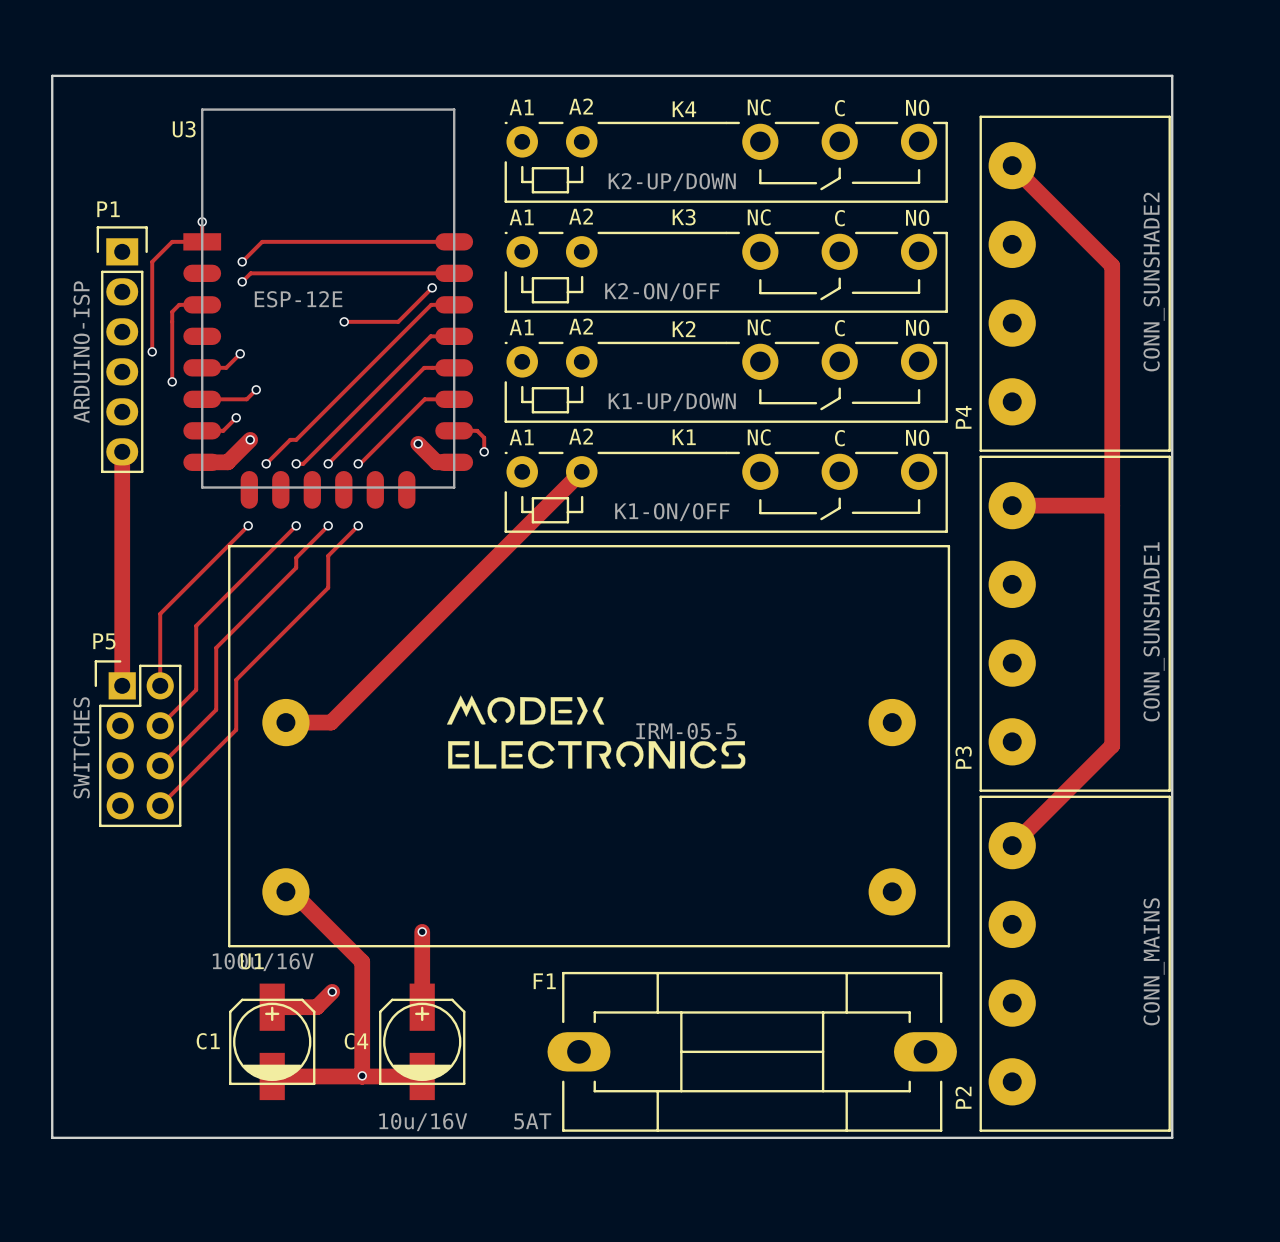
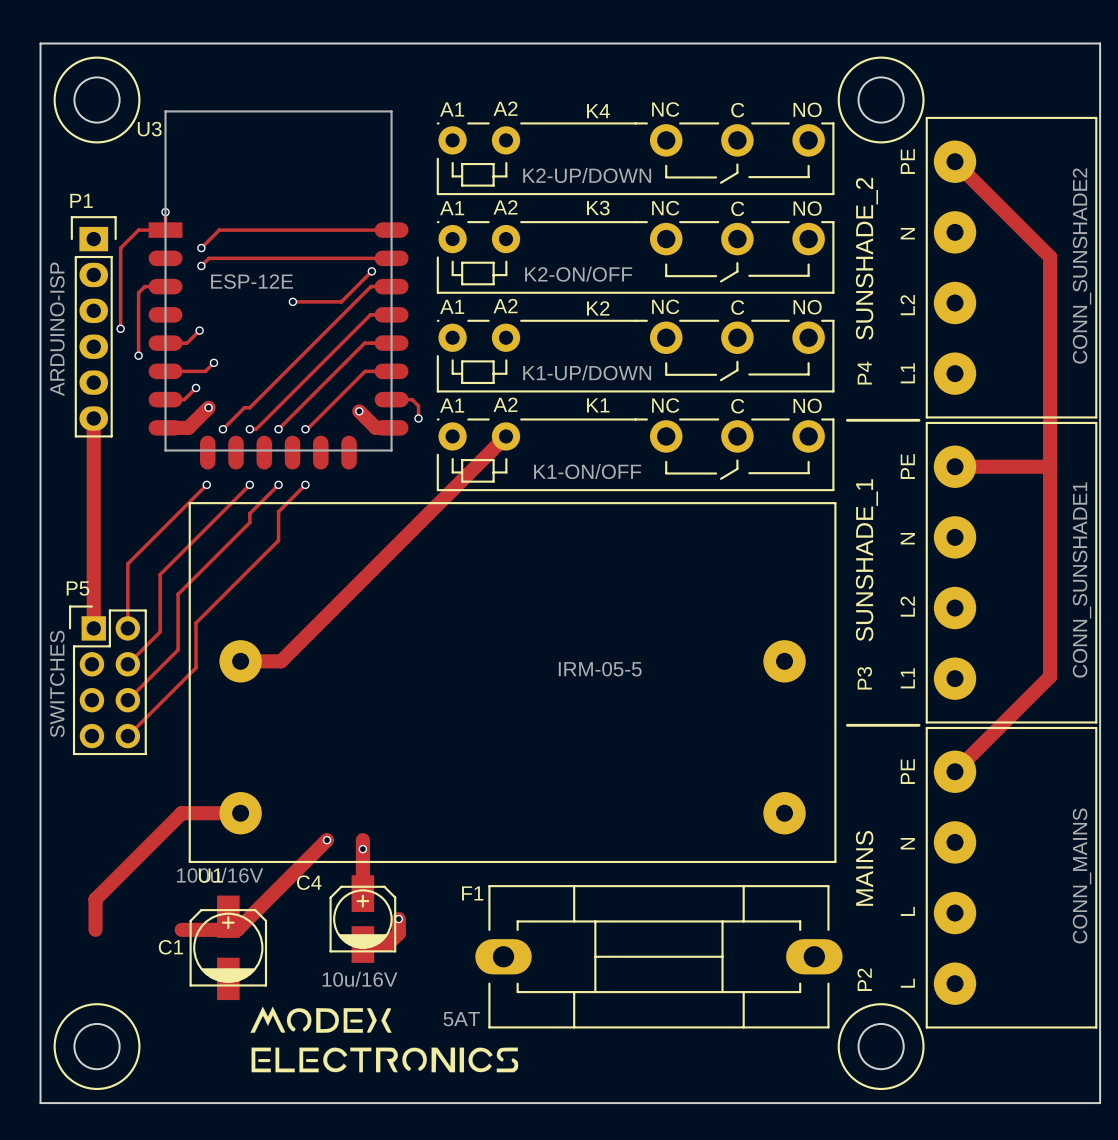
board edge: (52, 75) (1172, 75) (1172, 1137) (52, 1137) (52, 75) -> none
track: (1012, 165) (1112, 265) (1112, 745) (1012, 845) -> none
text: none -> PE (907, 161)
track: none -> (955, 161) (1050, 257) (1050, 676) (955, 771)
text: none -> N (907, 233)
text: none -> SUNSHADE_2 (866, 258)
P4 position: (1075, 283) -> (1011, 267)
text: none -> L2 (907, 305)
text: none -> L1 (907, 373)
P4 name position: P4 (963, 417) -> P4 (864, 373)
line: none -> (847, 420) (919, 420)
track: (1012, 505) (1082, 505) -> none
text: none -> PE (907, 466)
track: none -> (981, 466) (1050, 466)
text: none -> N (907, 538)
text: none -> SUNSHADE_1 (866, 560)
P3 position: (1075, 623) -> (1011, 572)
part: none -> (570, 573)
text: none -> L2 (907, 606)
drawing: [446, 695, 746, 769] -> none
text: none -> L1 (907, 678)
P3 name position: P3 (963, 757) -> P3 (864, 678)
line: none -> (847, 725) (919, 725)
text: none -> PE (907, 771)
track: (285, 891) (292, 891) (362, 961) (362, 1076) -> (240, 813) (181, 813) (95, 899) (95, 929)
track: none -> (327, 840) (237, 929) (181, 929)
via: none -> (327, 840)
track: none -> (362, 840) (362, 849)
text: none -> N (907, 843)
text: none -> MAINS (864, 868)
P2 position: (1075, 963) -> (1011, 877)
C4 footprint: [379, 983, 466, 1101] -> [329, 875, 397, 963]
track: (332, 991) (316, 1007) (272, 1007) -> none
via: (332, 991) -> none
text: none -> L (907, 911)
track: none -> (398, 919) (398, 933) (387, 944) (362, 944)
via: none -> (398, 919)
C4 name position: C4 (356, 1041) -> C4 (309, 882)
via: (362, 1075) -> none
track: (272, 1076) (422, 1076) -> none
text: none -> L (907, 983)
P2 name position: P2 (963, 1097) -> P2 (864, 979)
drawing: none -> [250, 1006, 519, 1073]

